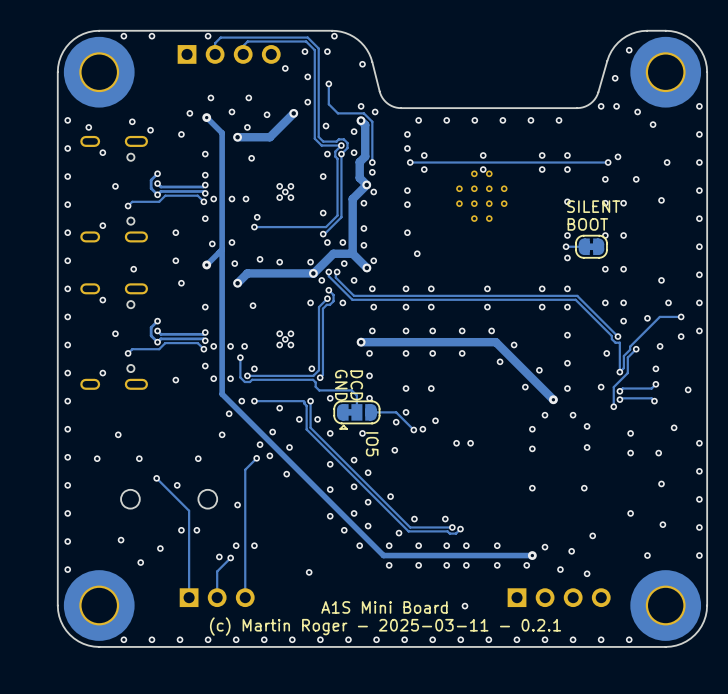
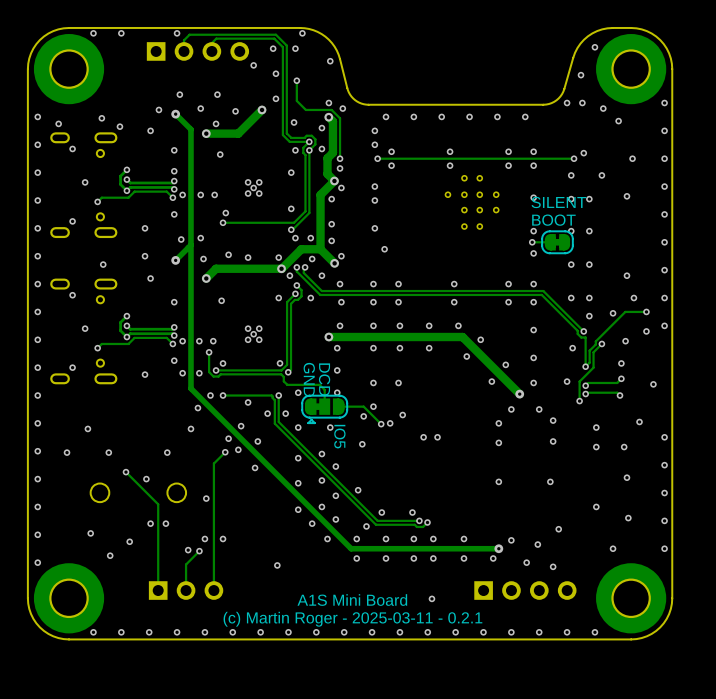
part: (481, 196) -> none
part: none -> (472, 202)

